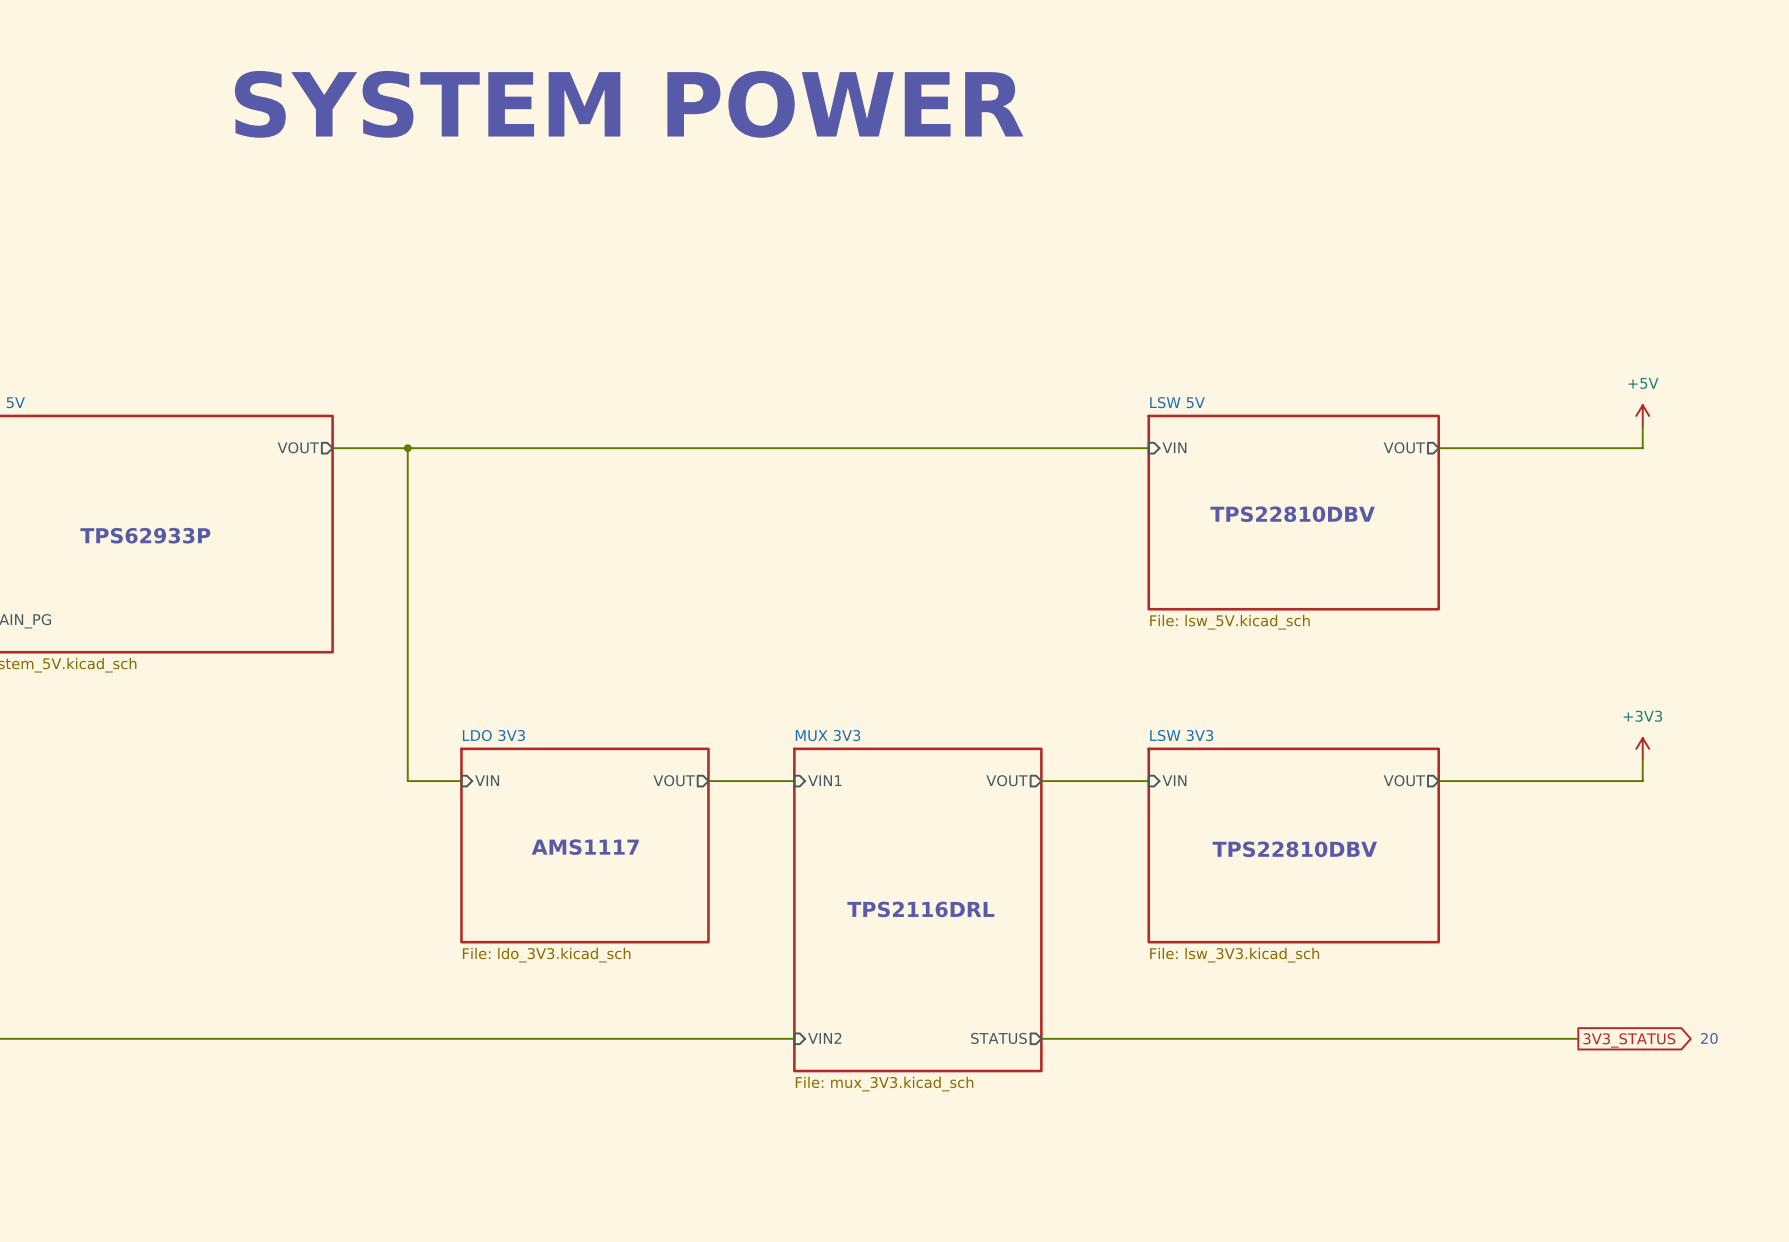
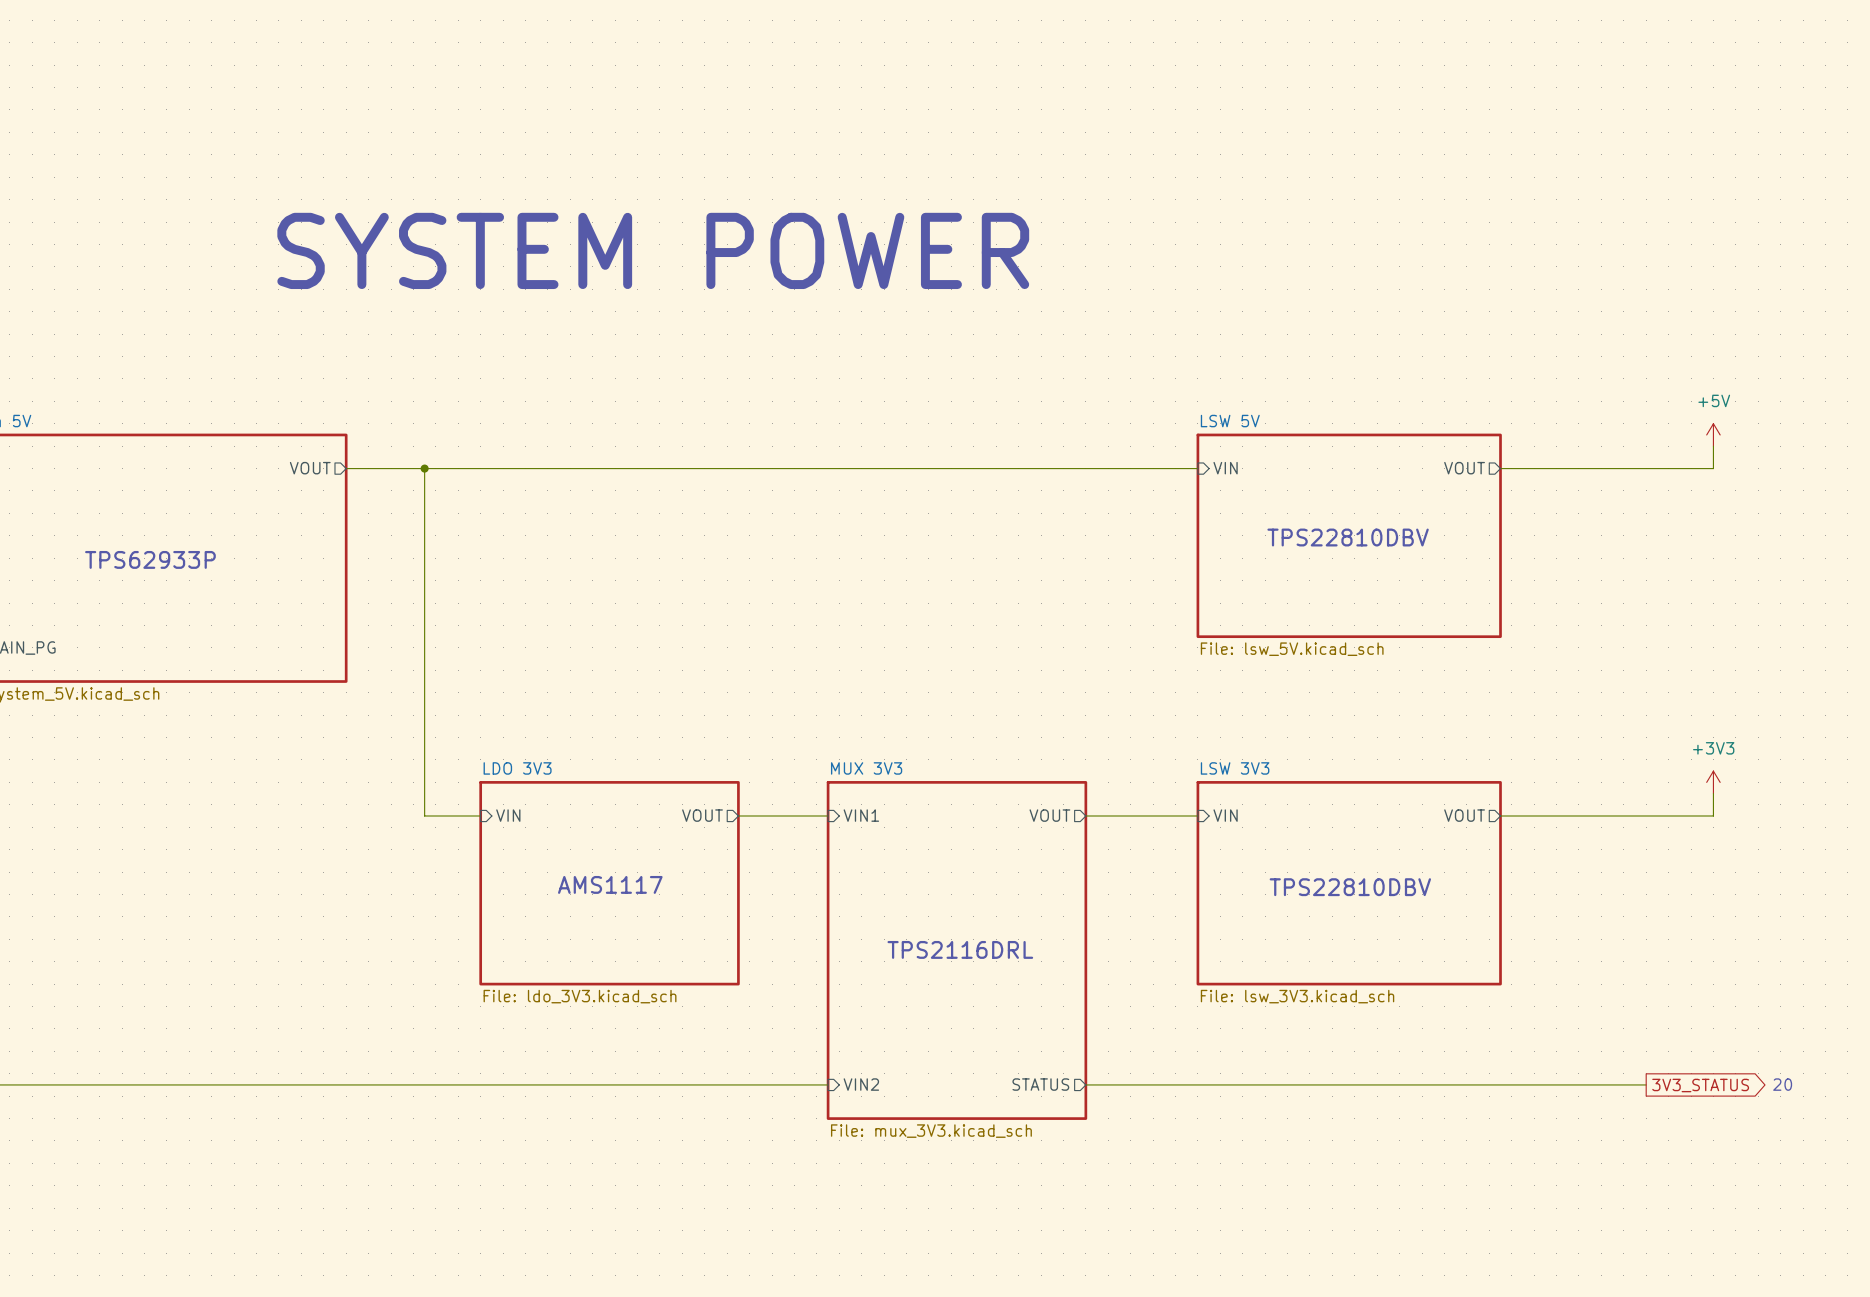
text position: SYSTEM POWER (629, 104) -> SYSTEM POWER (653, 250)

